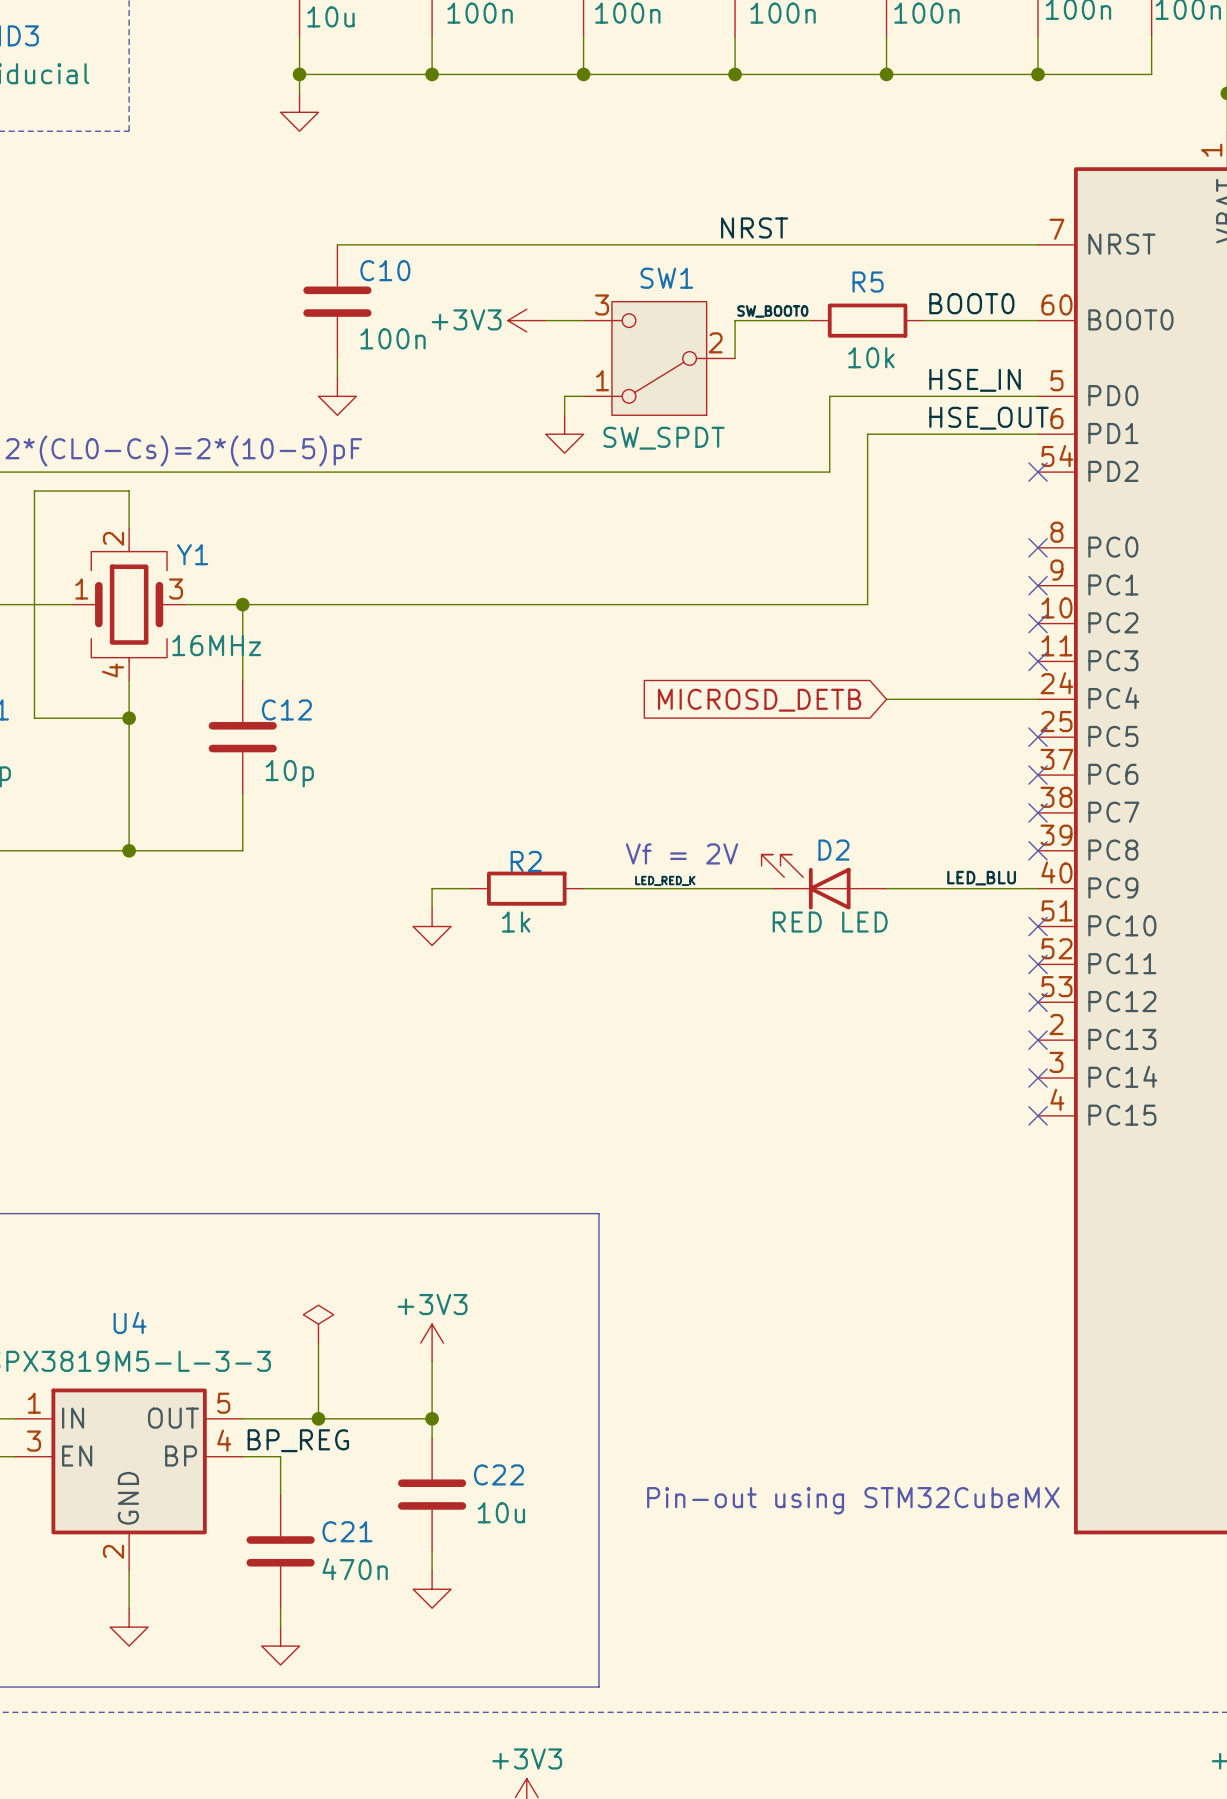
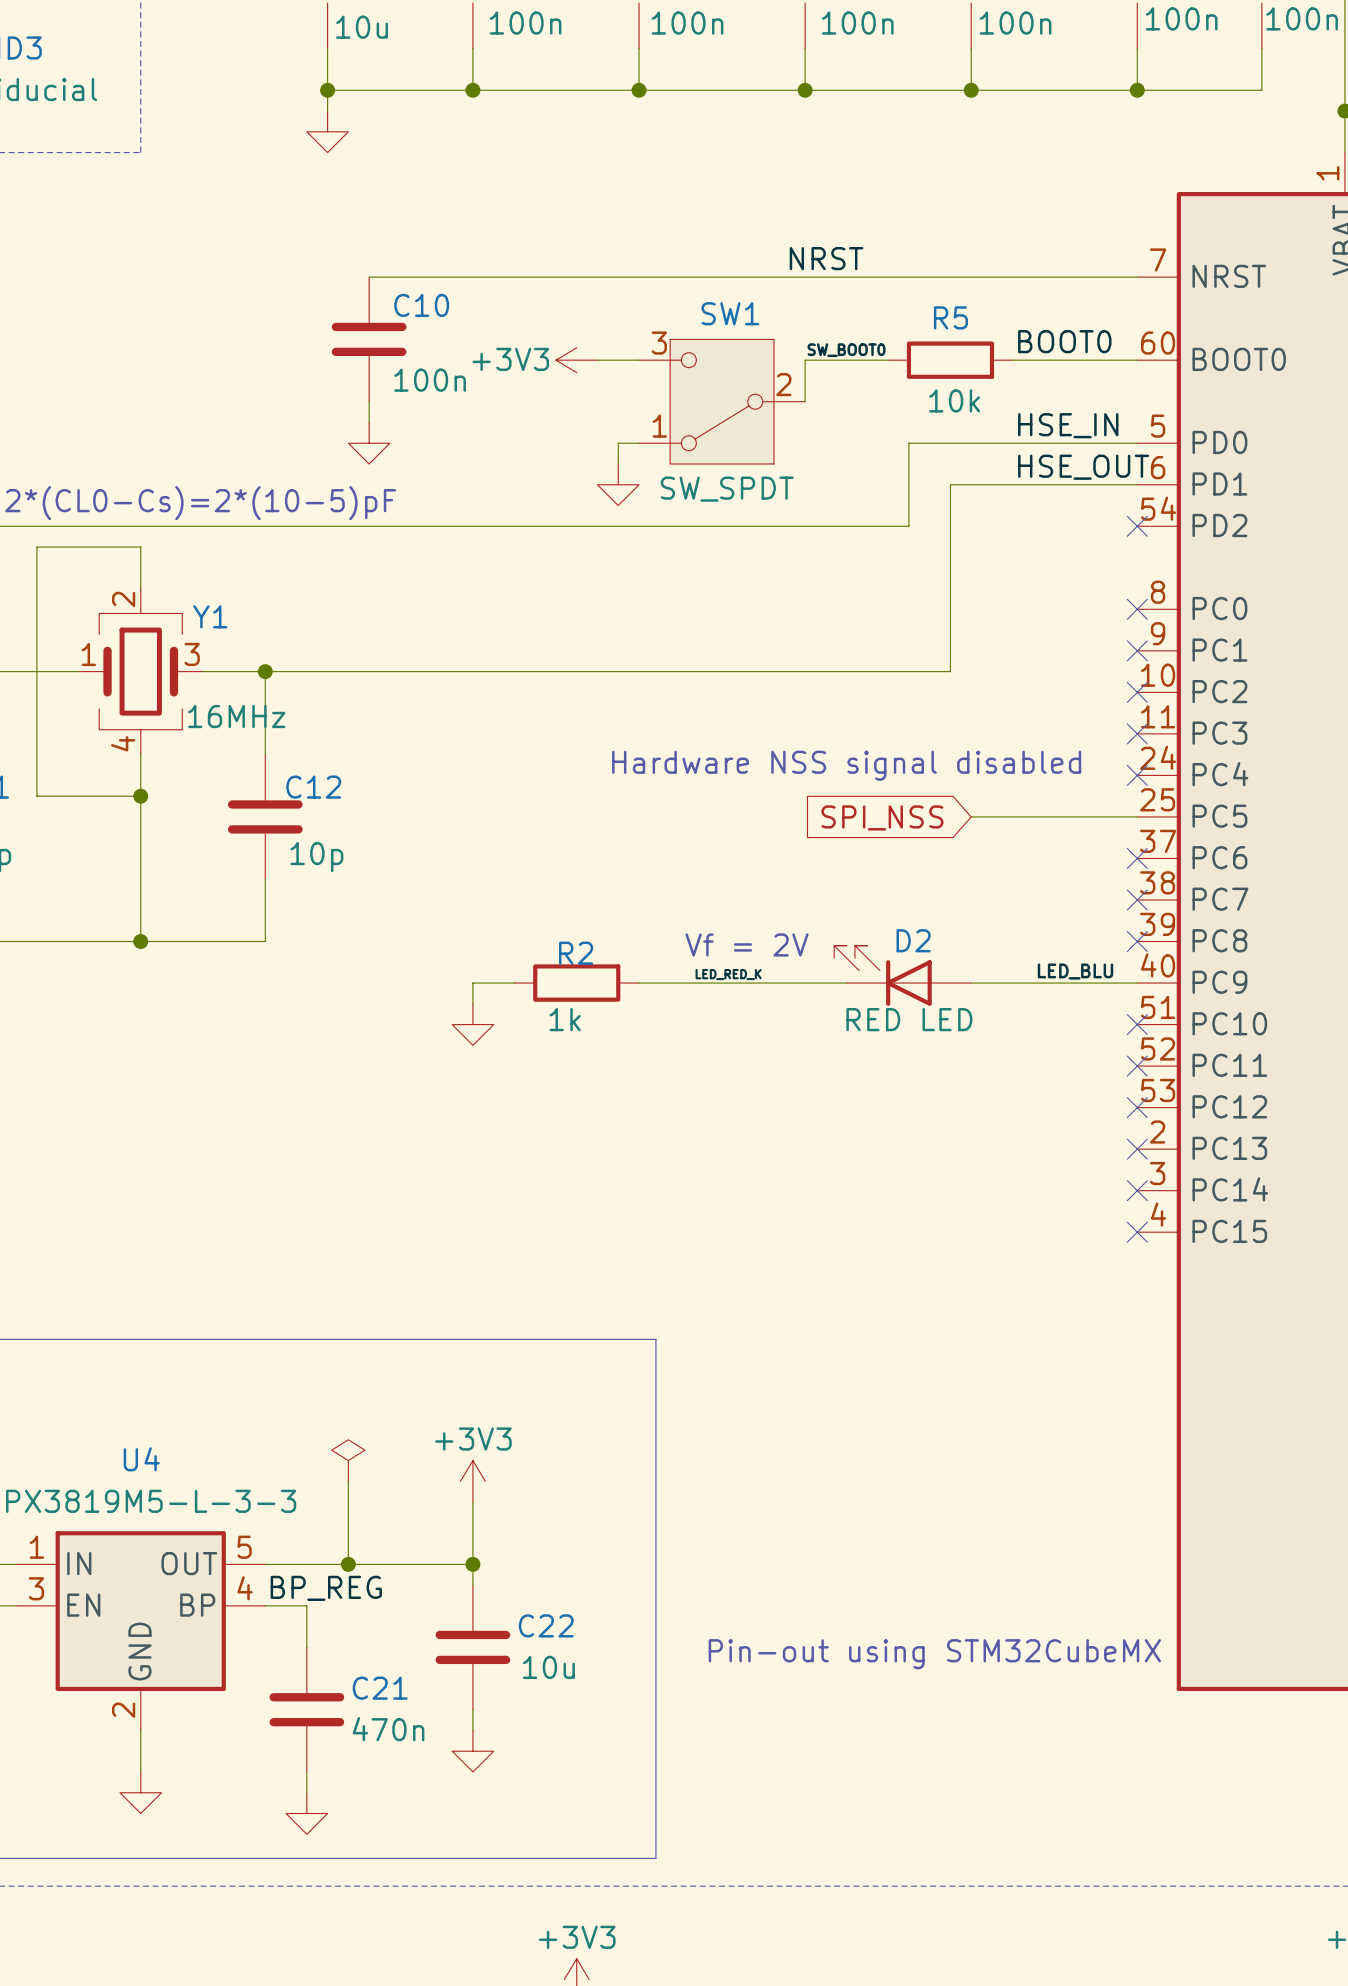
text: none -> Hardware NSS signal disabled (846, 765)
wire: (886, 699) (1038, 699) -> (971, 816) (1137, 816)
global label: MICROSD_DETB (759, 700) -> none
no-connect mark position: (1038, 737) -> (1137, 775)
global label: none -> SPI_NSS (882, 817)

